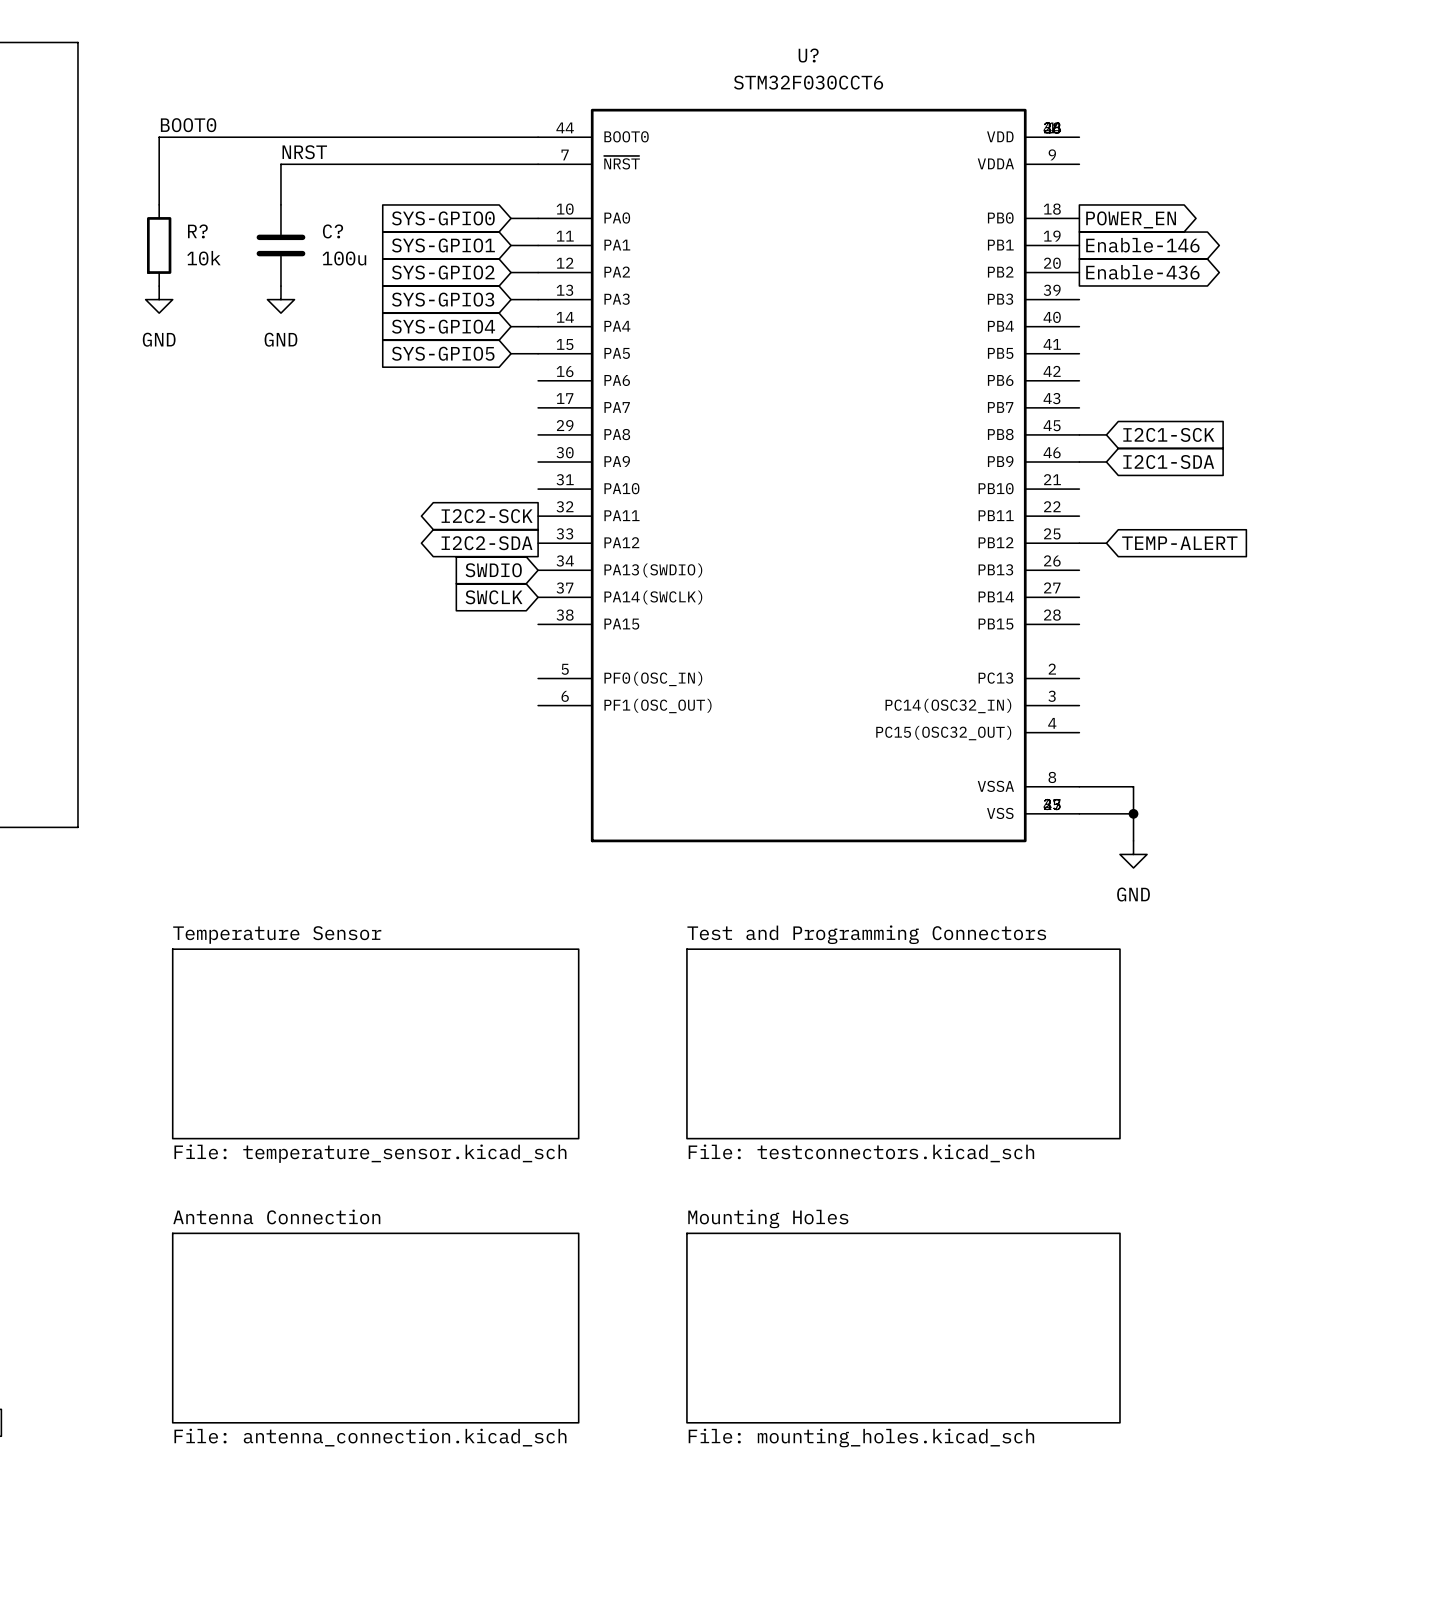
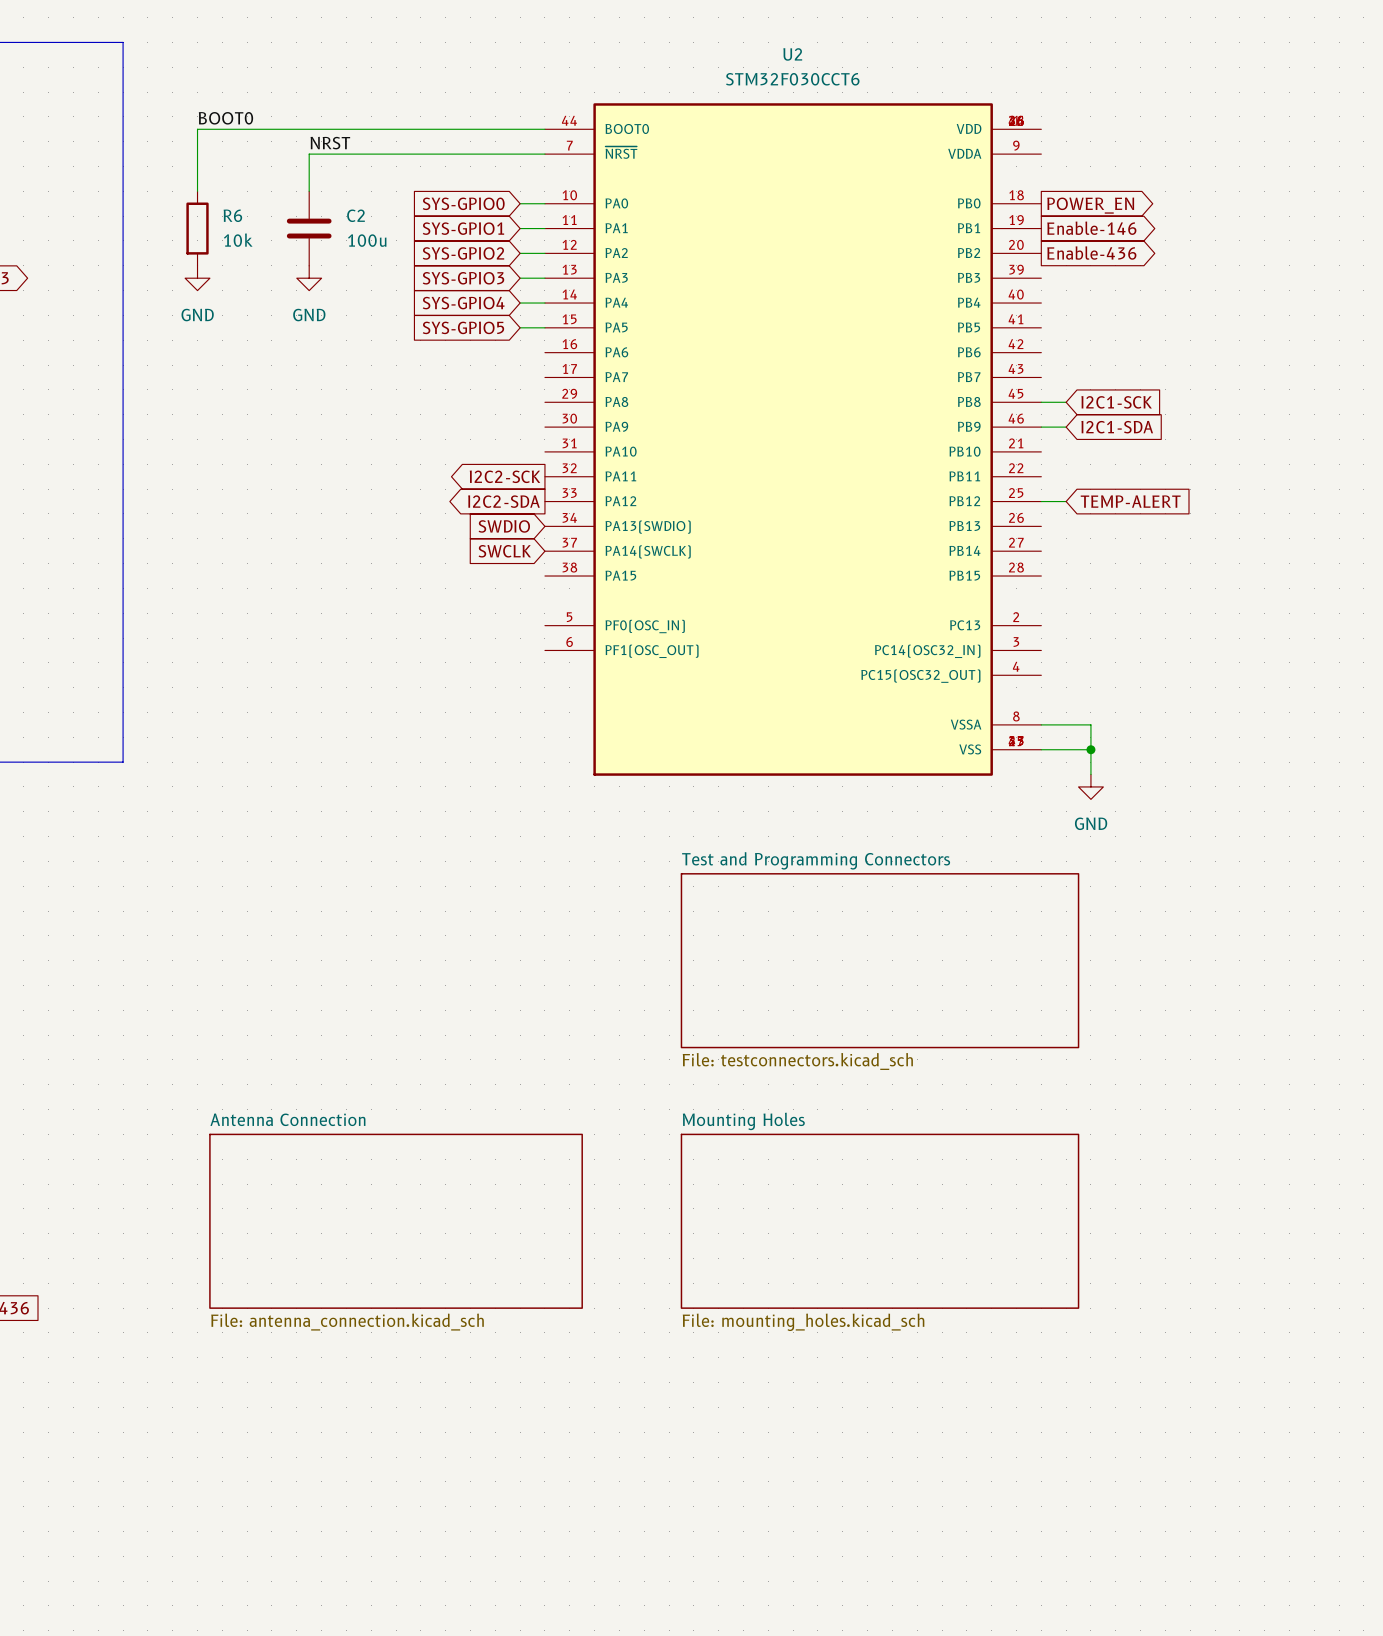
U? name: U? (808, 55) -> U2 (792, 54)
R? name: R? (197, 231) -> R6 (232, 215)
C? name: C? (333, 231) -> C2 (355, 215)
sheet Temperature Sensor: File: temperature_sensor.kicad_sch (375, 1043) -> none

